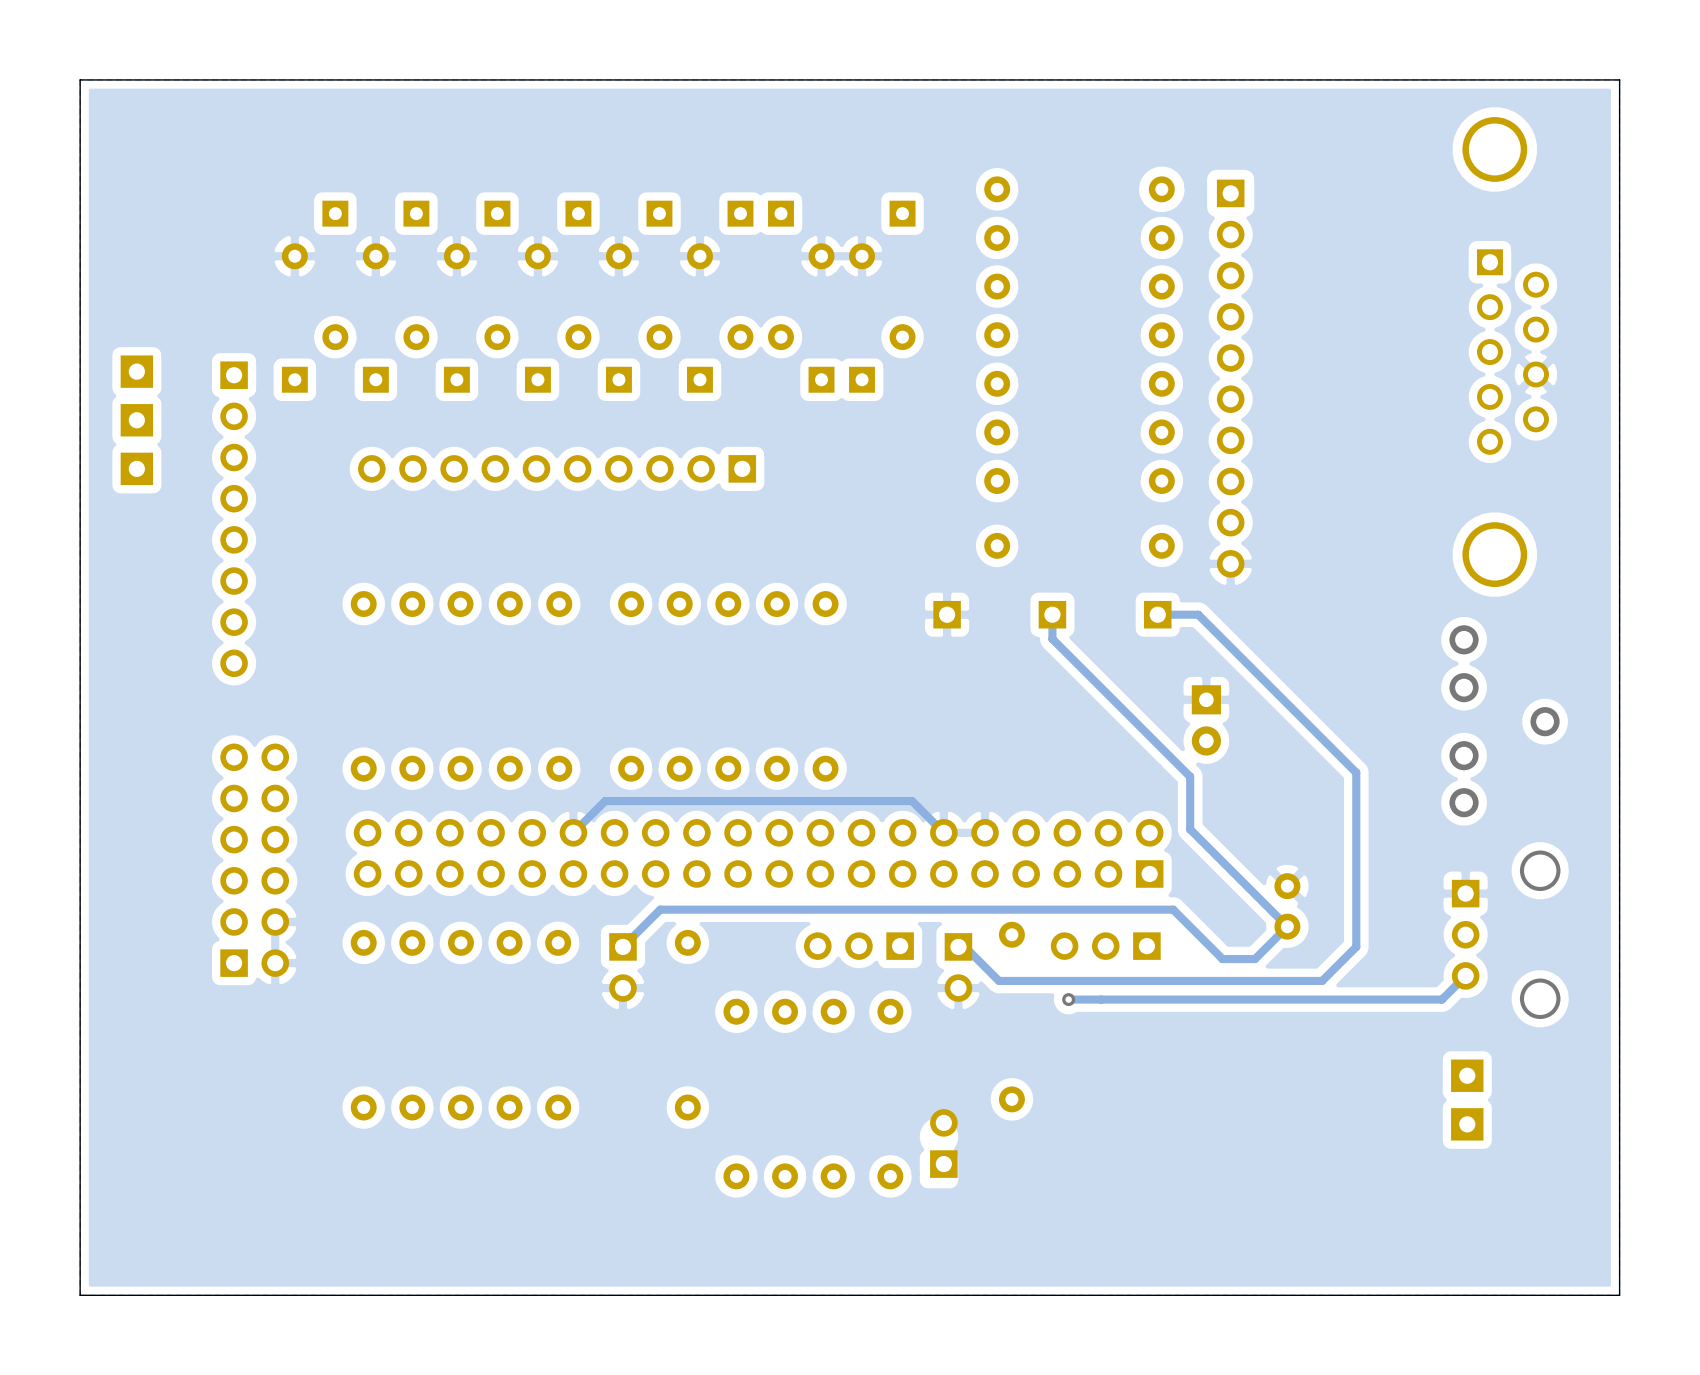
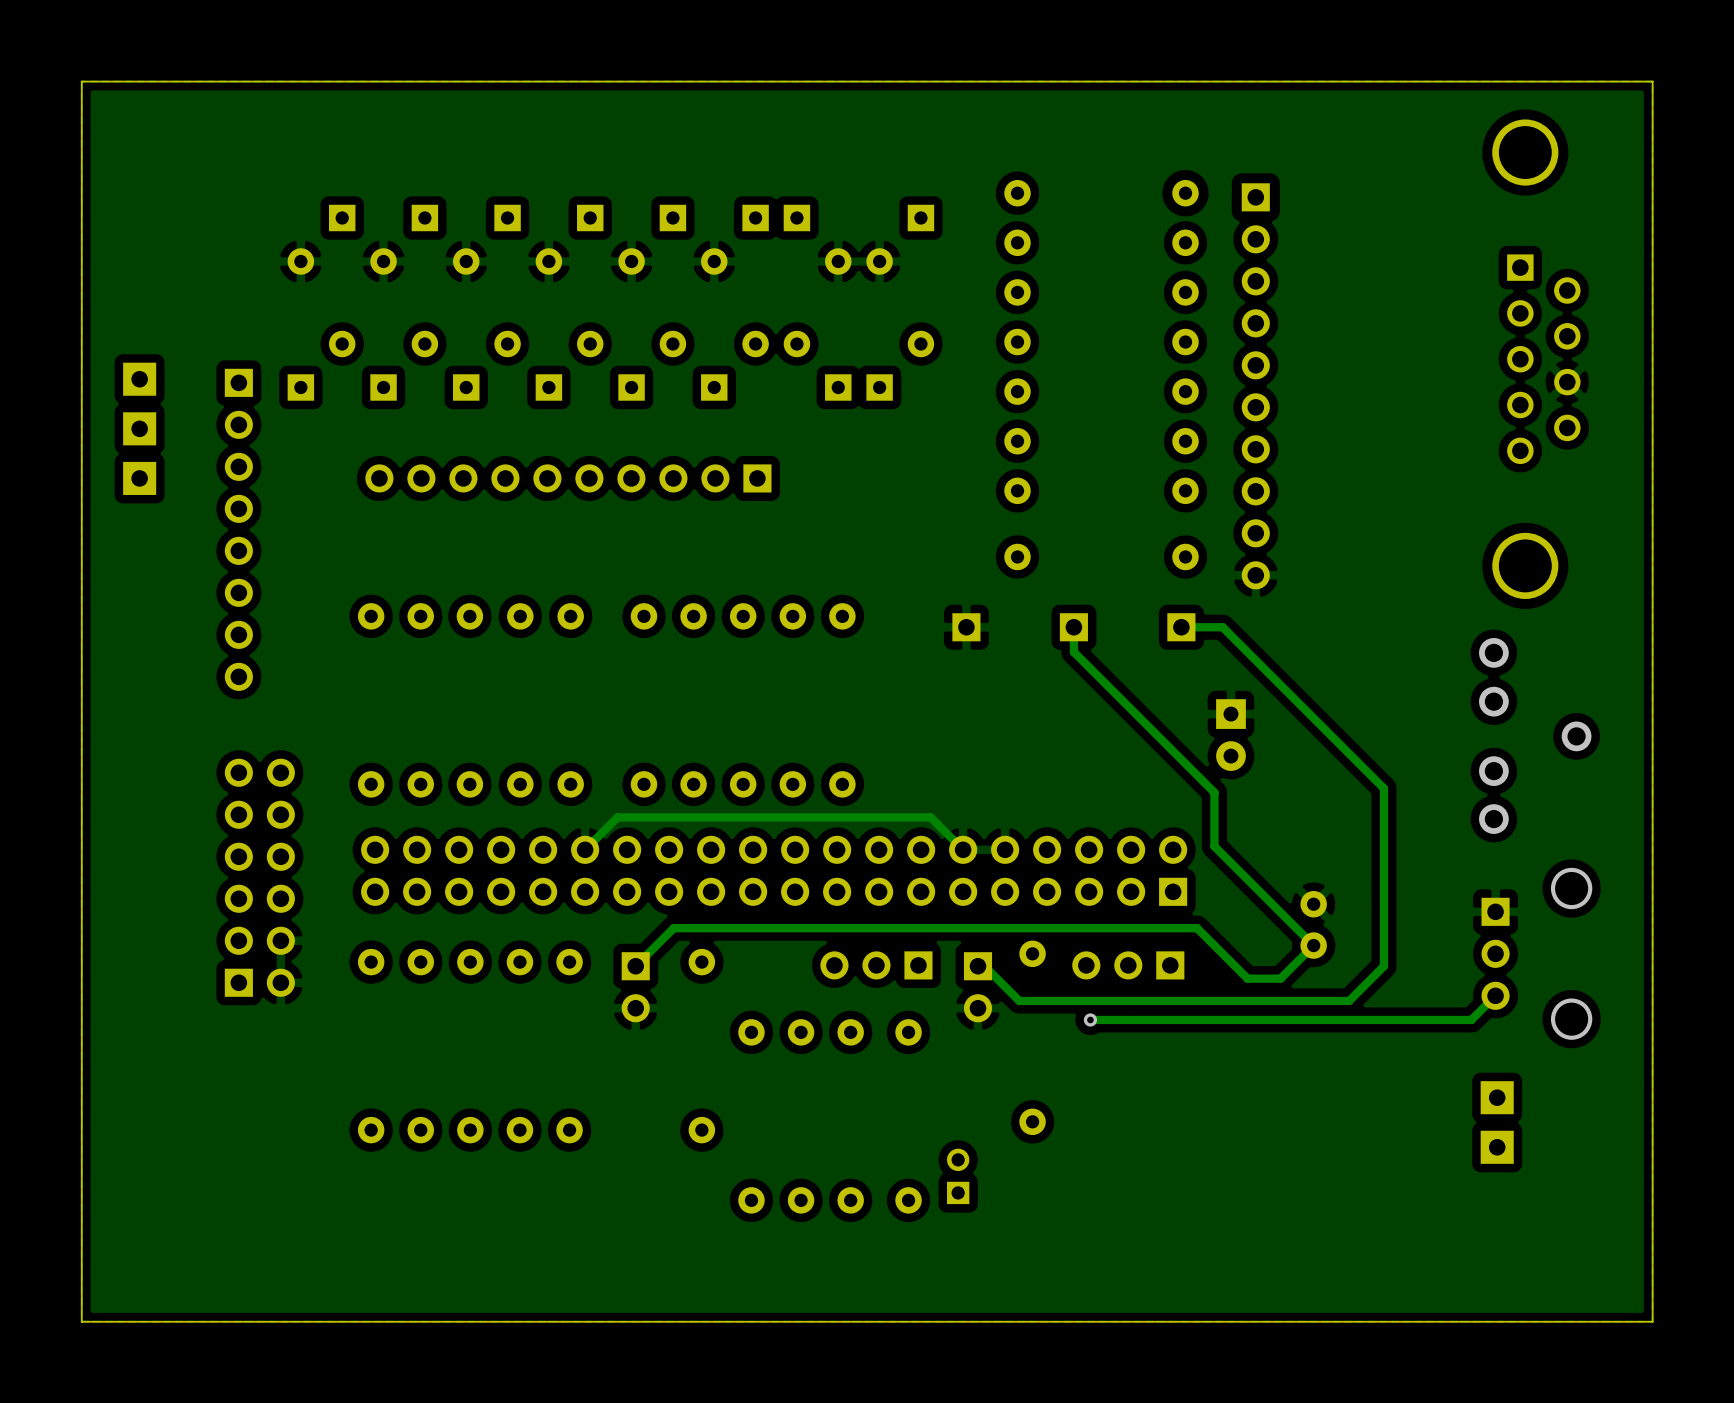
part footprint: [930, 1109, 958, 1178] -> [946, 1148, 970, 1205]

